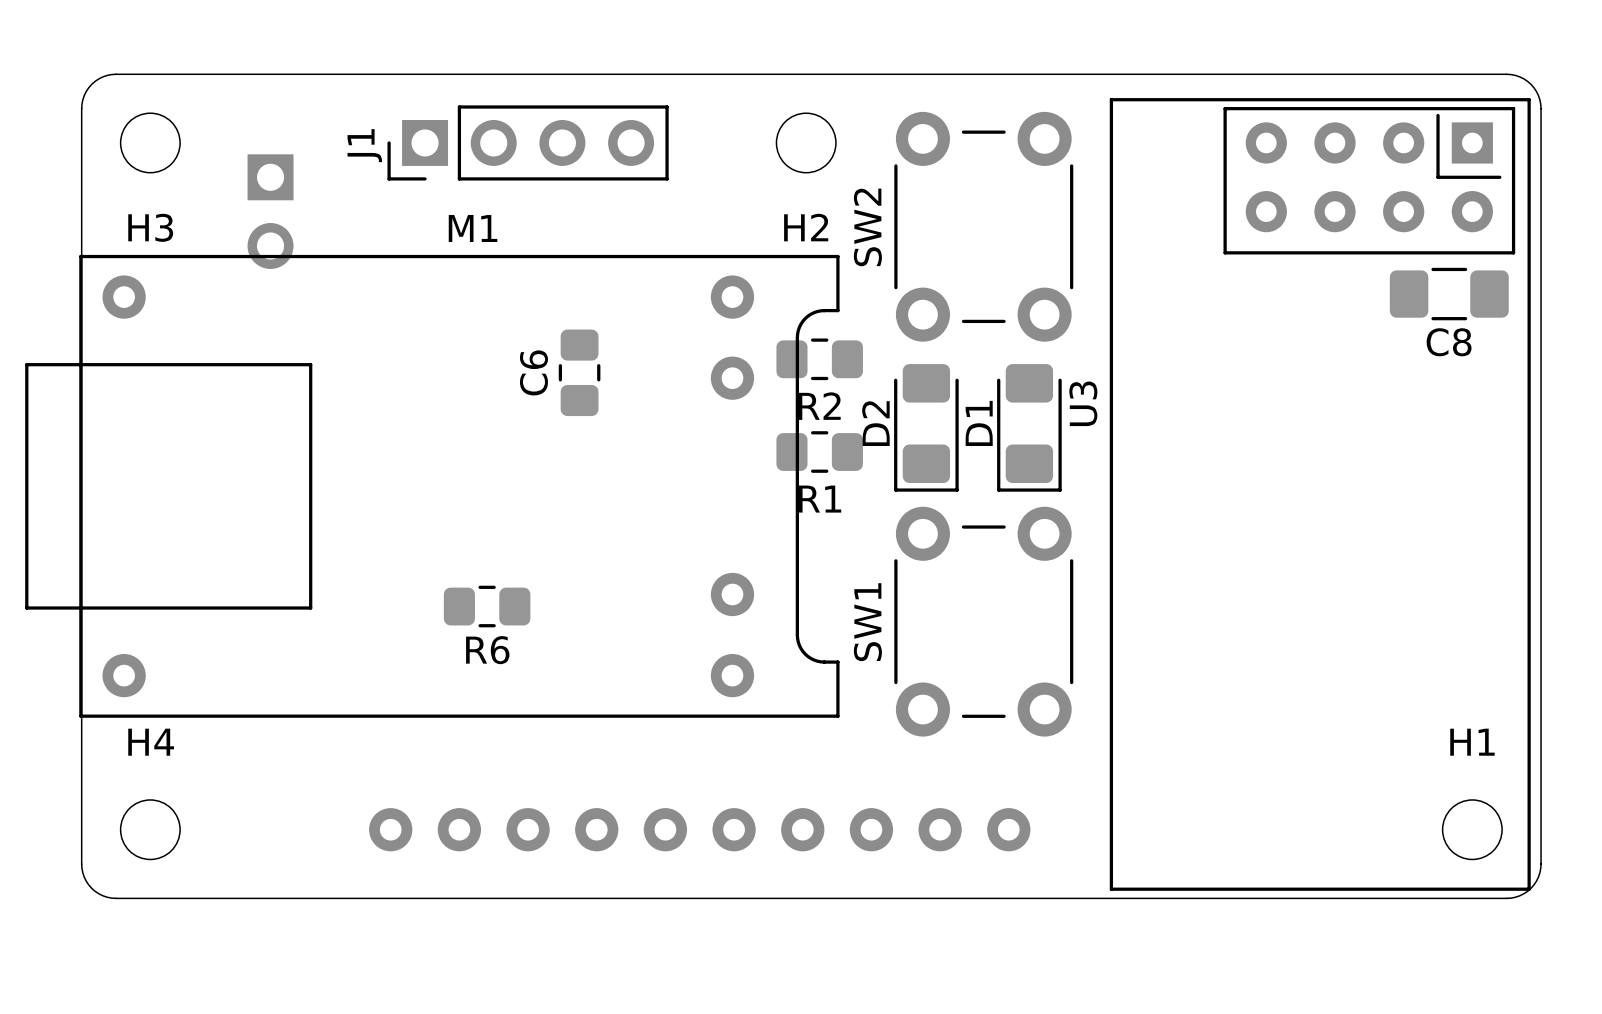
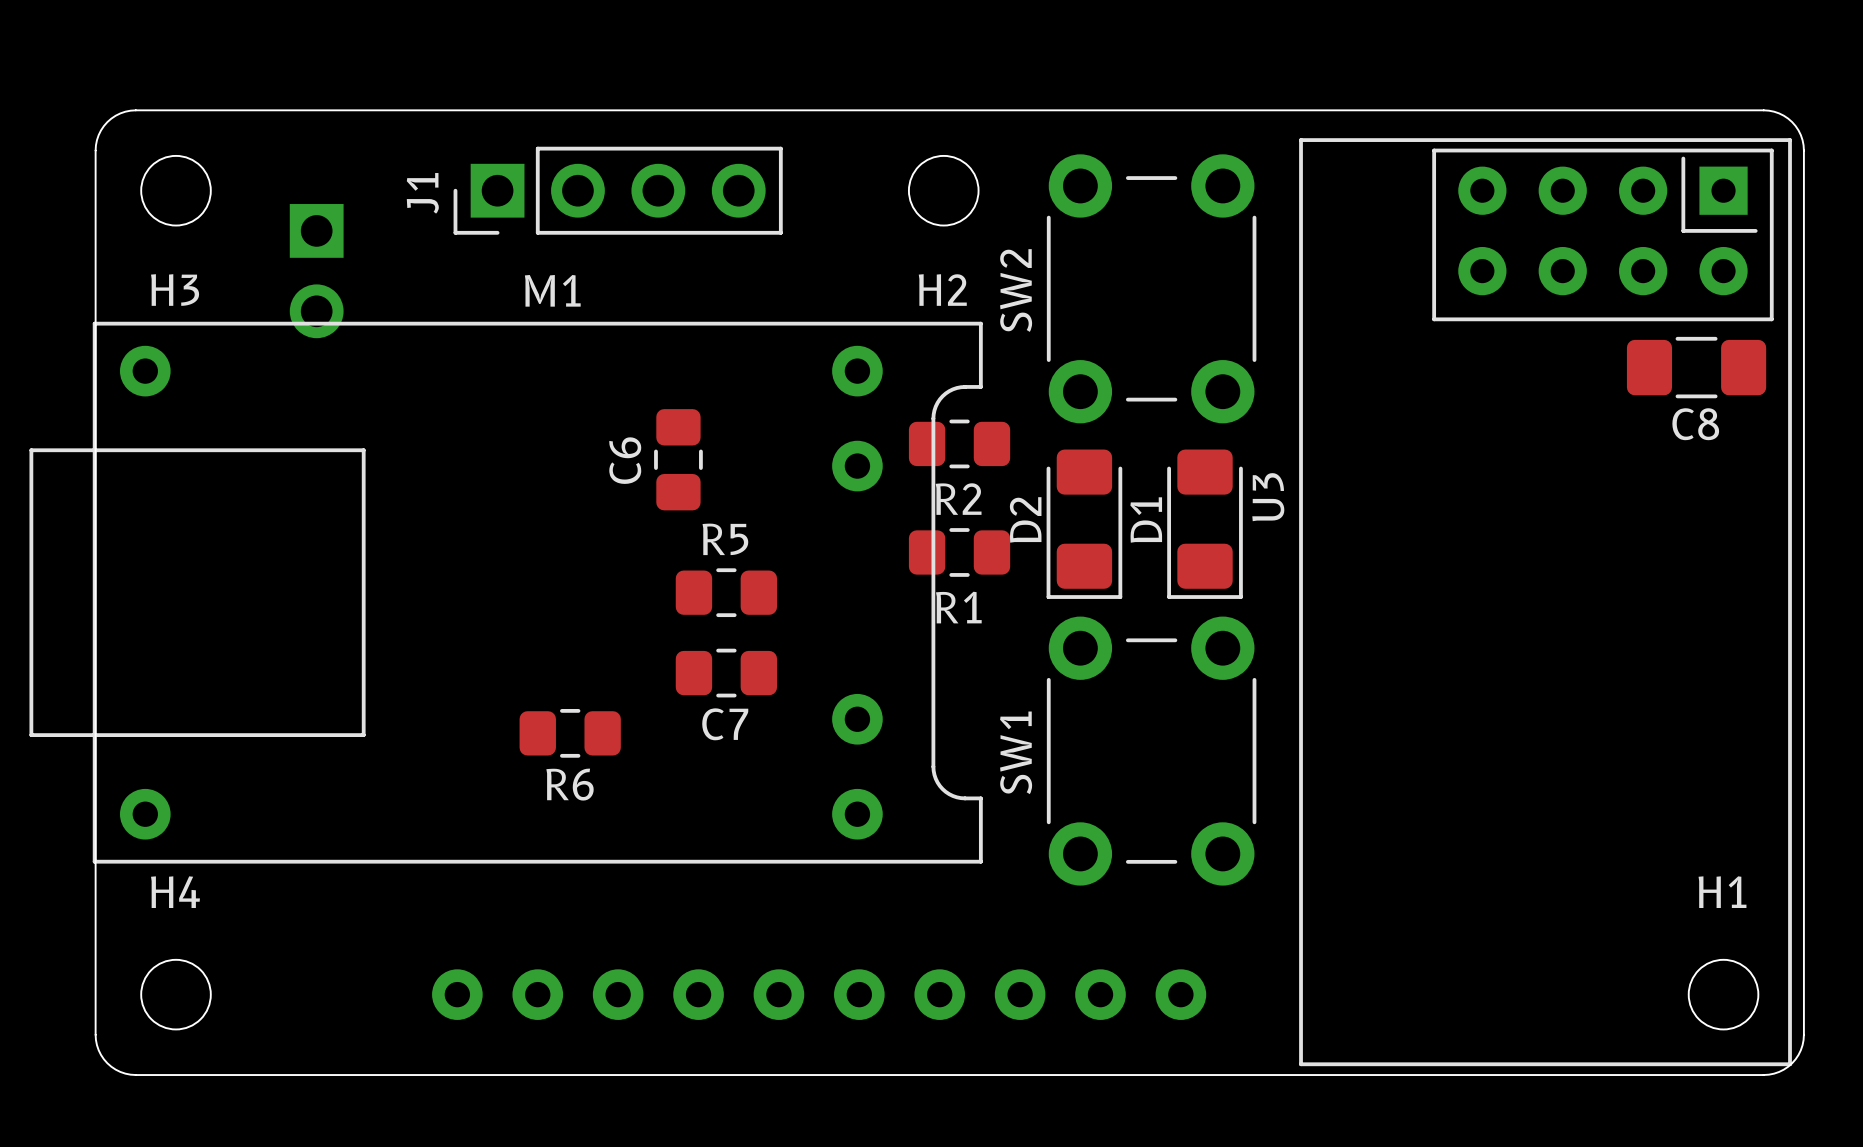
R5: none -> (726, 592)
C7: none -> (726, 673)

